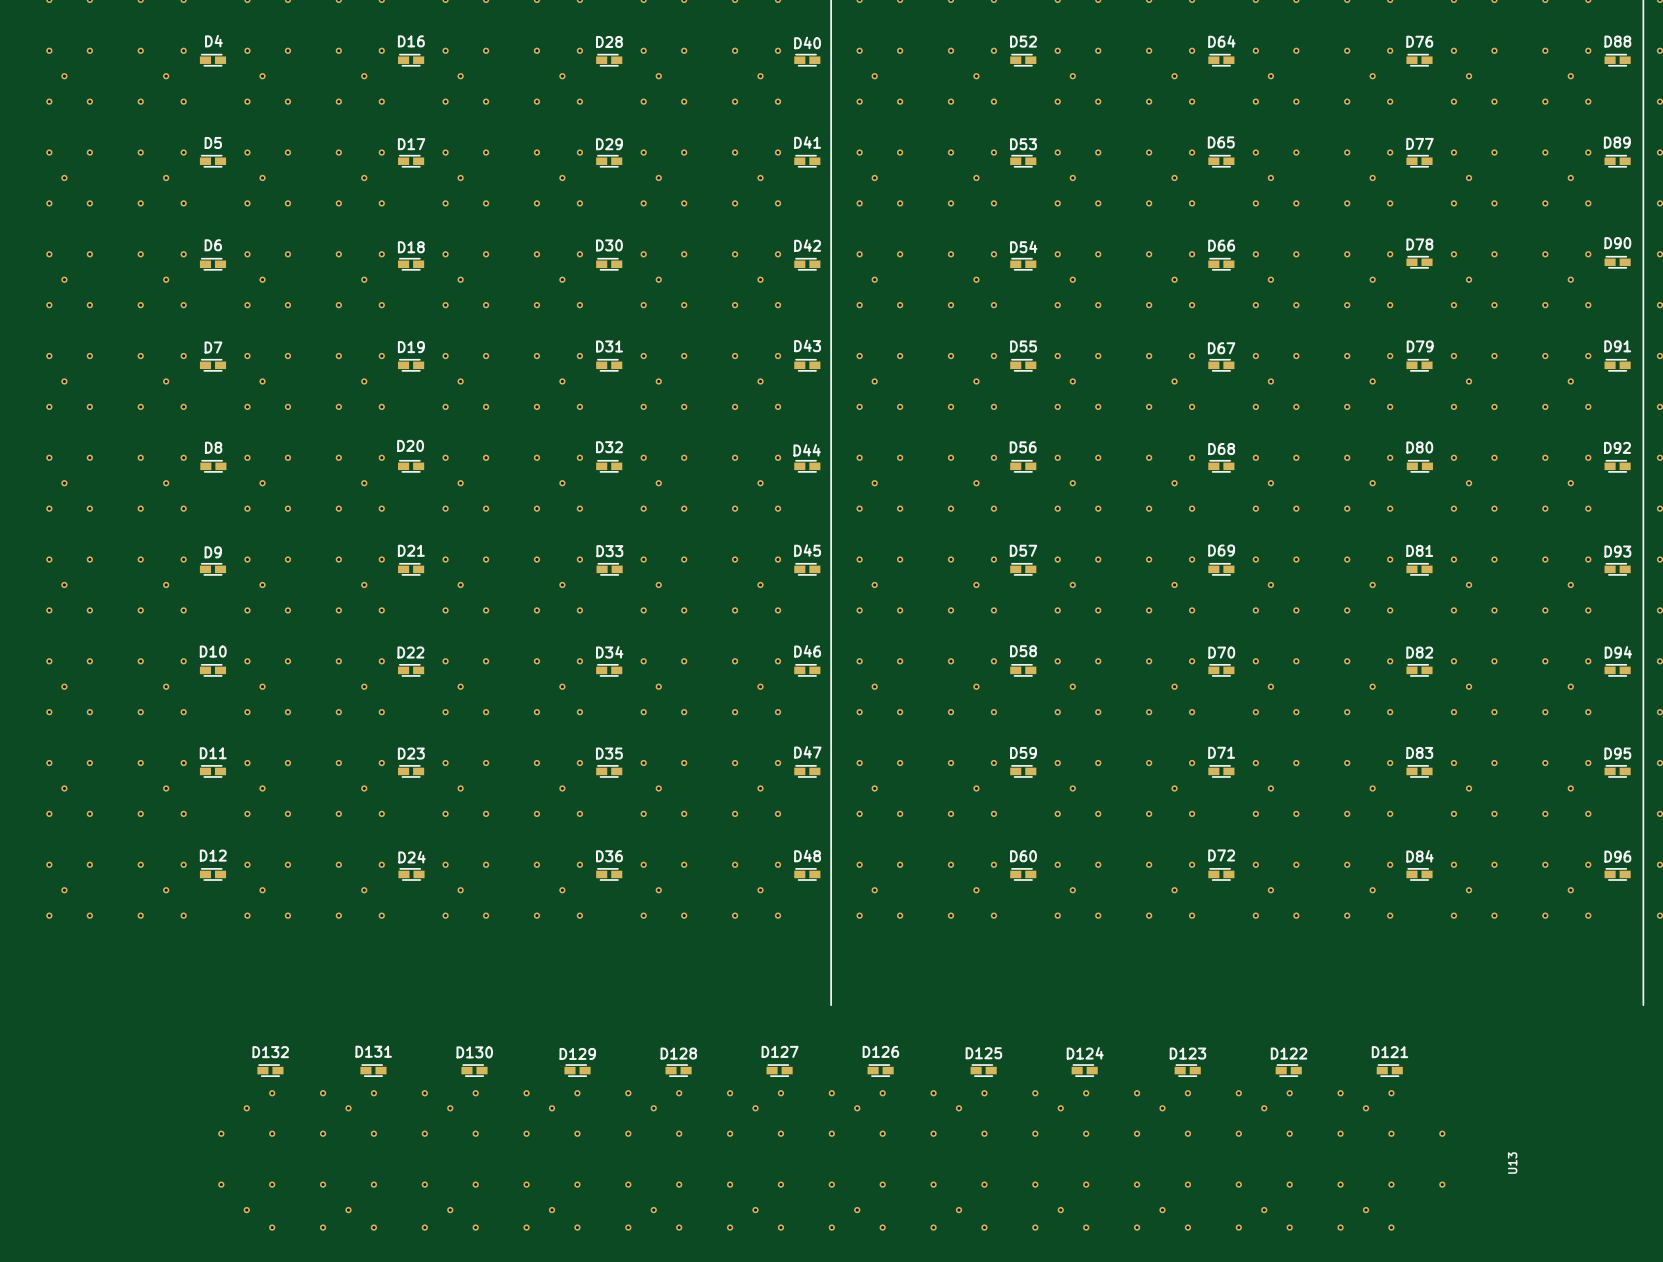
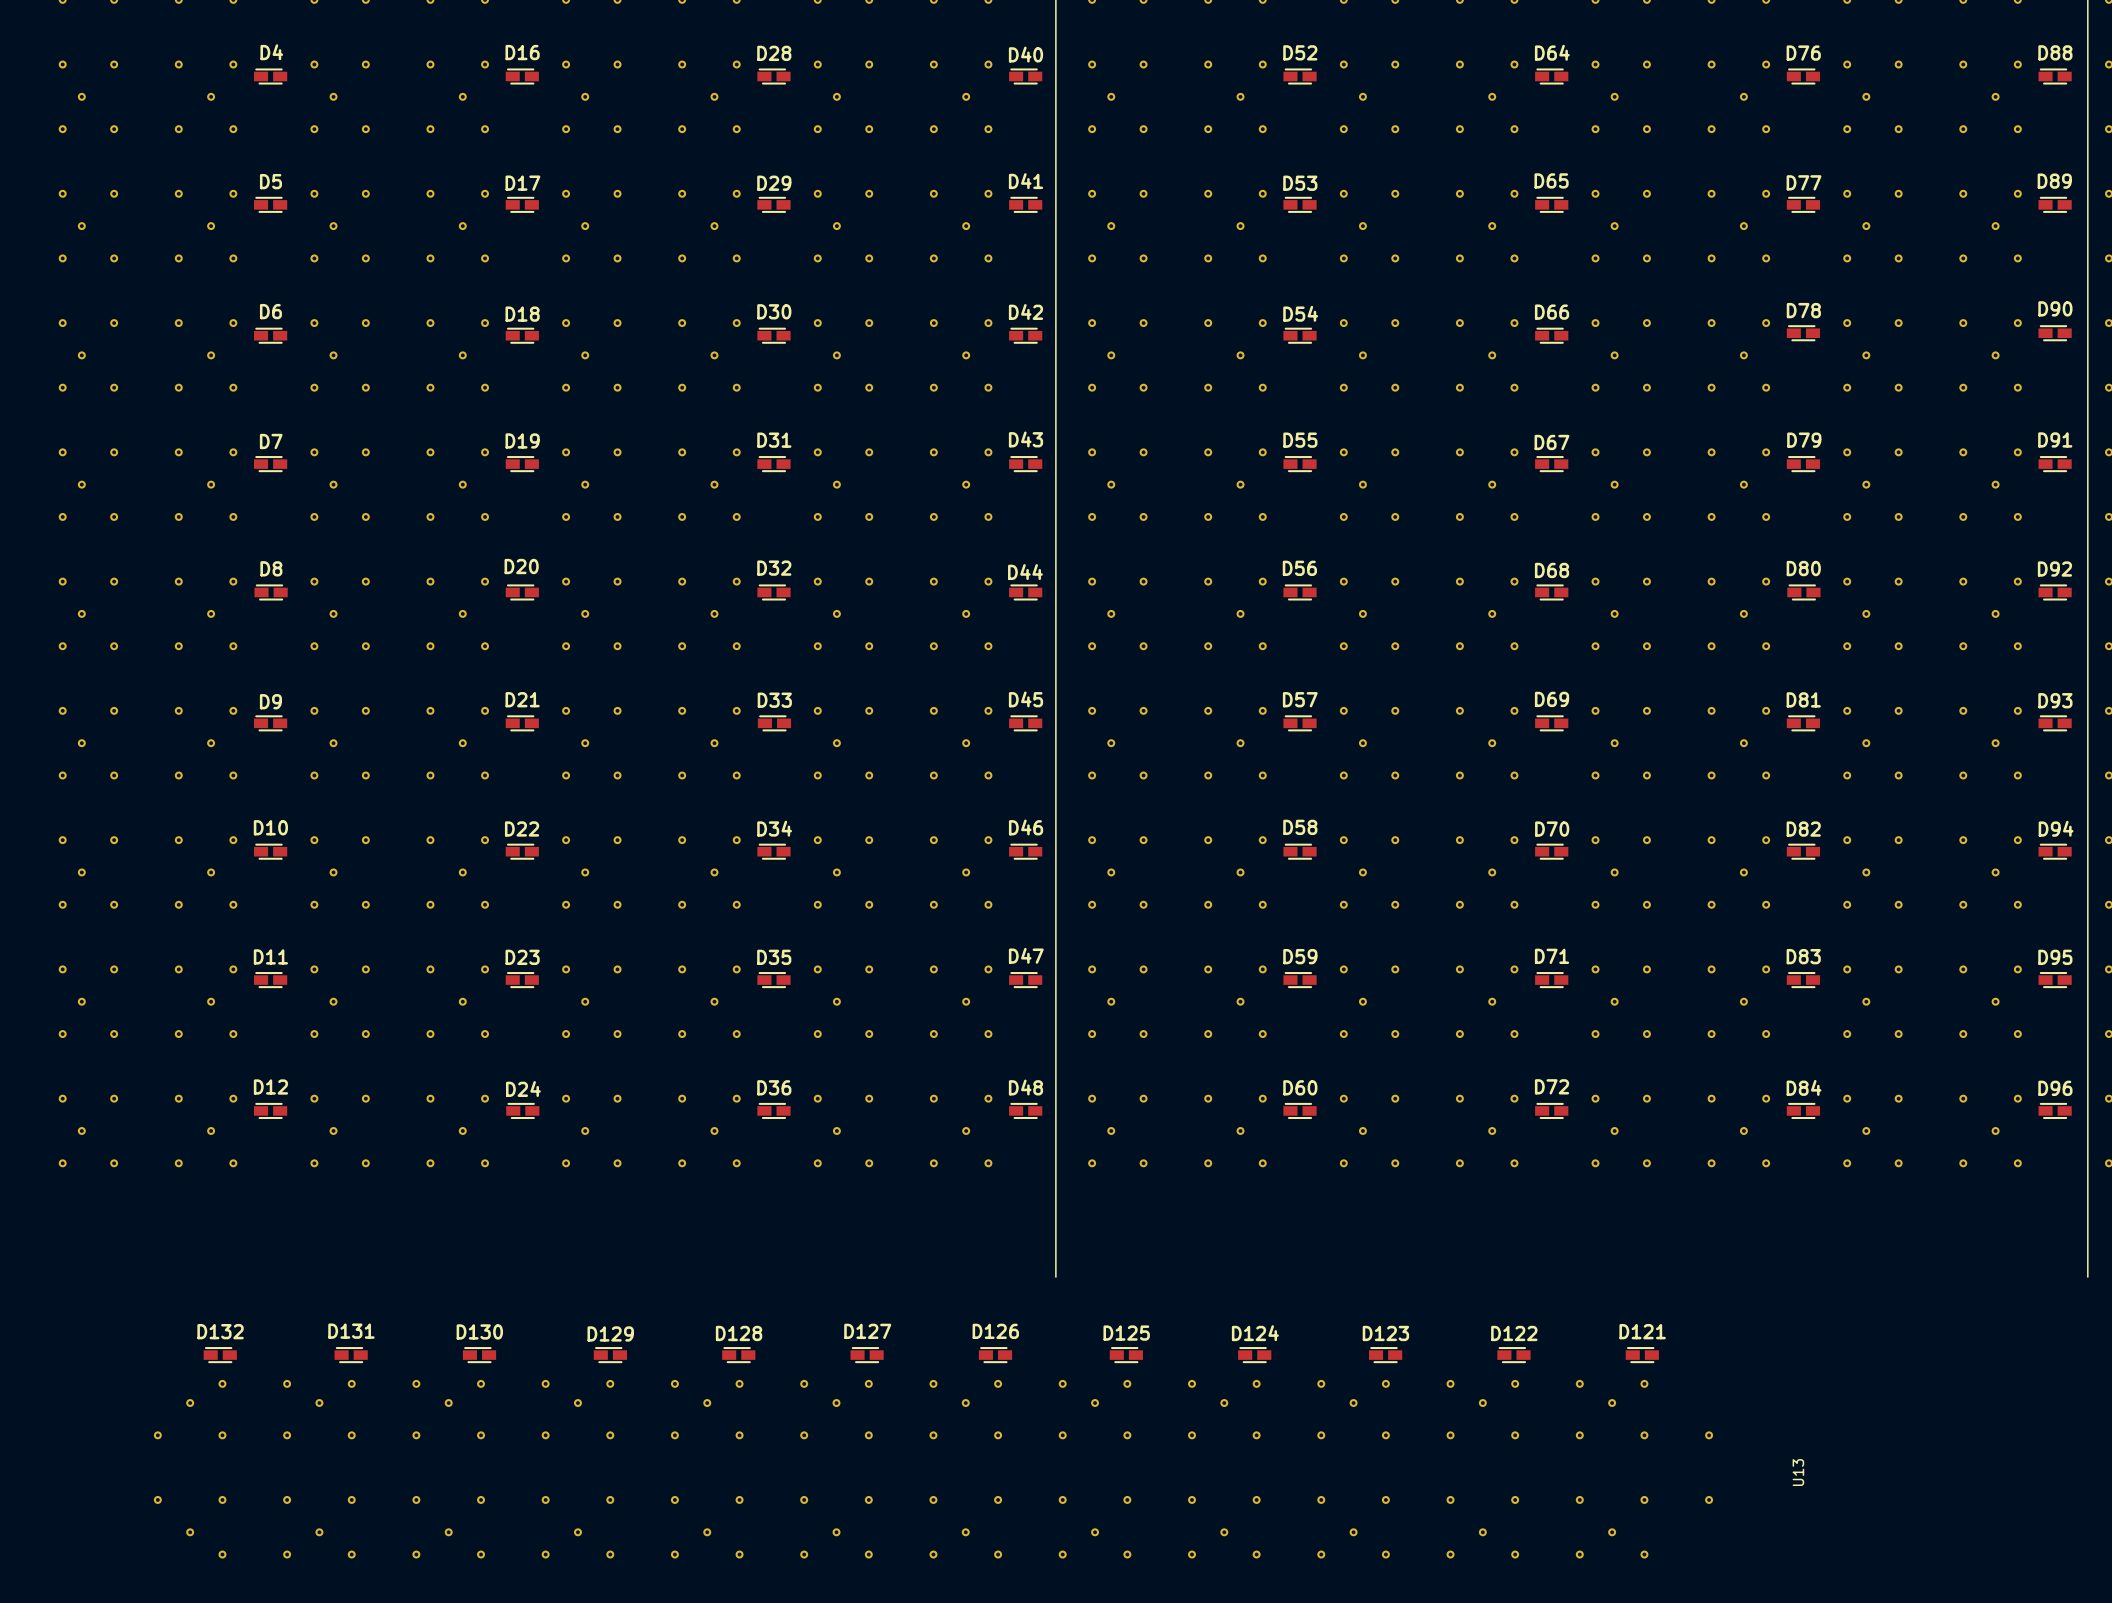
D132 position: (270, 1070) -> (220, 1355)
D131 position: (373, 1070) -> (351, 1355)
D130 position: (474, 1070) -> (479, 1355)
D129 position: (577, 1070) -> (610, 1355)
D128 position: (678, 1070) -> (738, 1355)
D127 position: (779, 1070) -> (867, 1355)
D126 position: (880, 1070) -> (995, 1355)
D125 position: (983, 1070) -> (1126, 1355)
D124 position: (1084, 1070) -> (1254, 1355)
D123 position: (1187, 1070) -> (1385, 1355)
D122 position: (1288, 1070) -> (1513, 1355)
D121 position: (1389, 1070) -> (1642, 1355)
U13 position: (831, 1160) -> (933, 1469)

